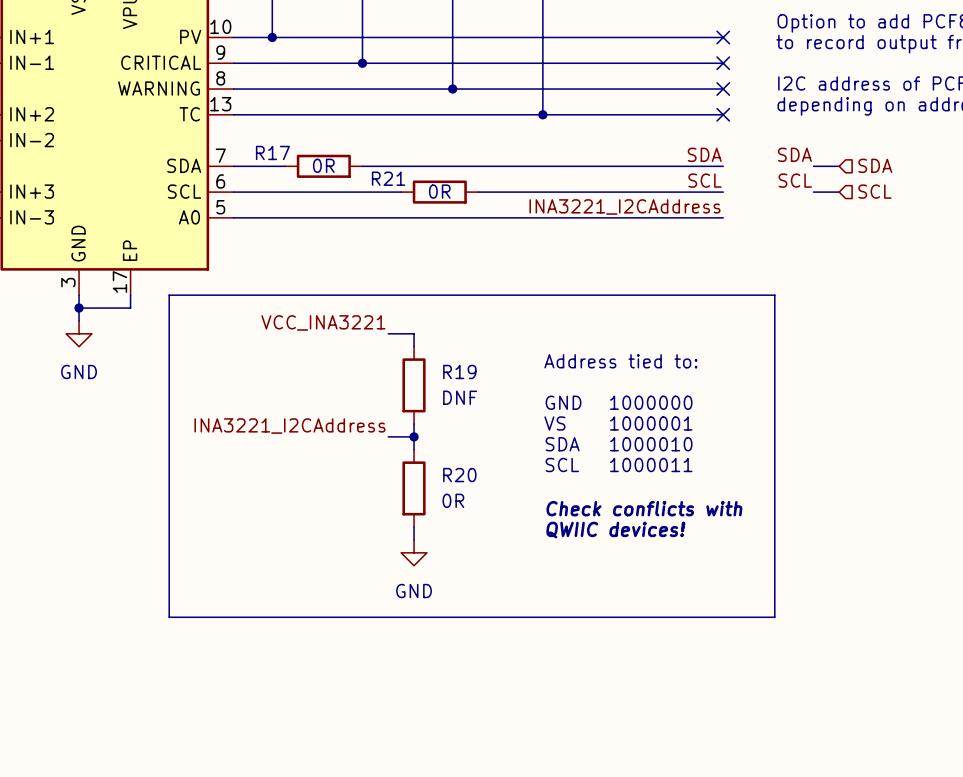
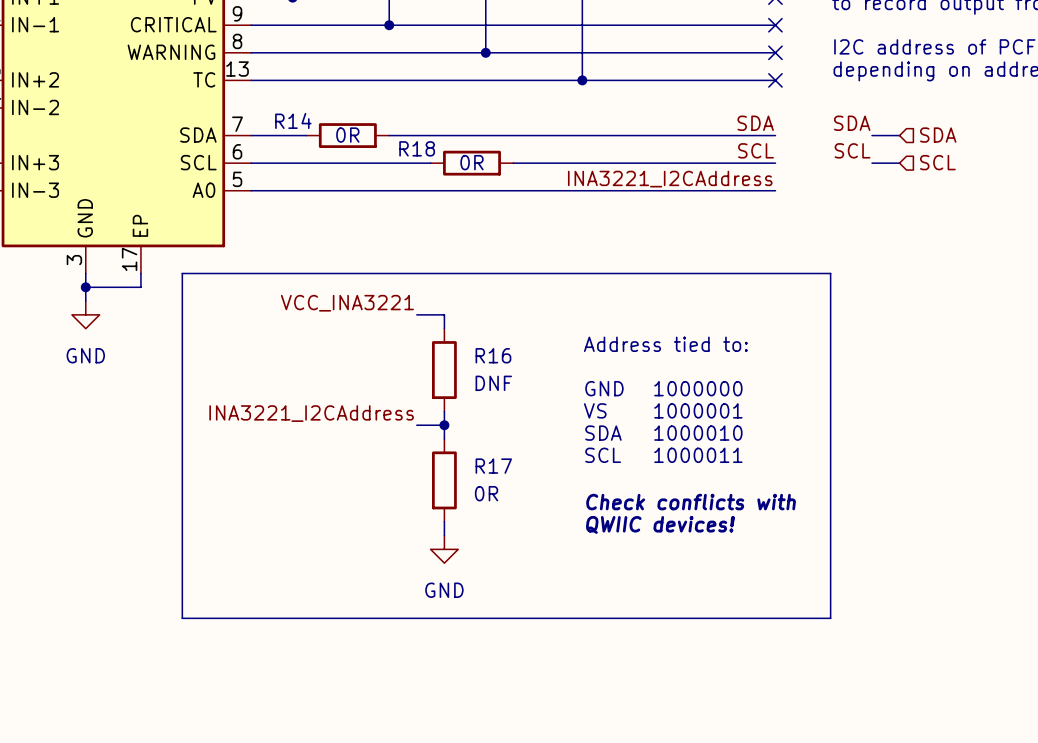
R17 name: R17 (272, 152) -> R14 (293, 120)
R21 name: R21 (388, 178) -> R18 (417, 148)
R19 name: R19 (459, 371) -> R16 (493, 355)
R20 name: R20 (459, 475) -> R17 (493, 466)

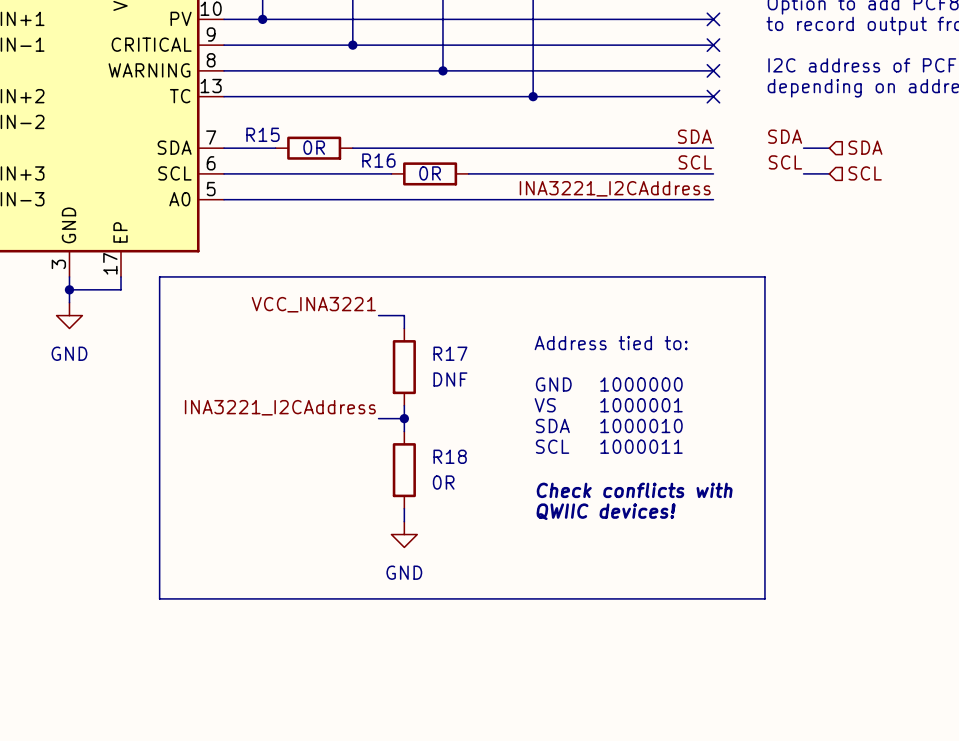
R14 name: R14 (293, 120) -> R15 (262, 134)
R18 name: R18 (417, 148) -> R16 (378, 160)
R16 name: R16 (493, 355) -> R17 (450, 353)
R17 name: R17 (493, 466) -> R18 (450, 456)

